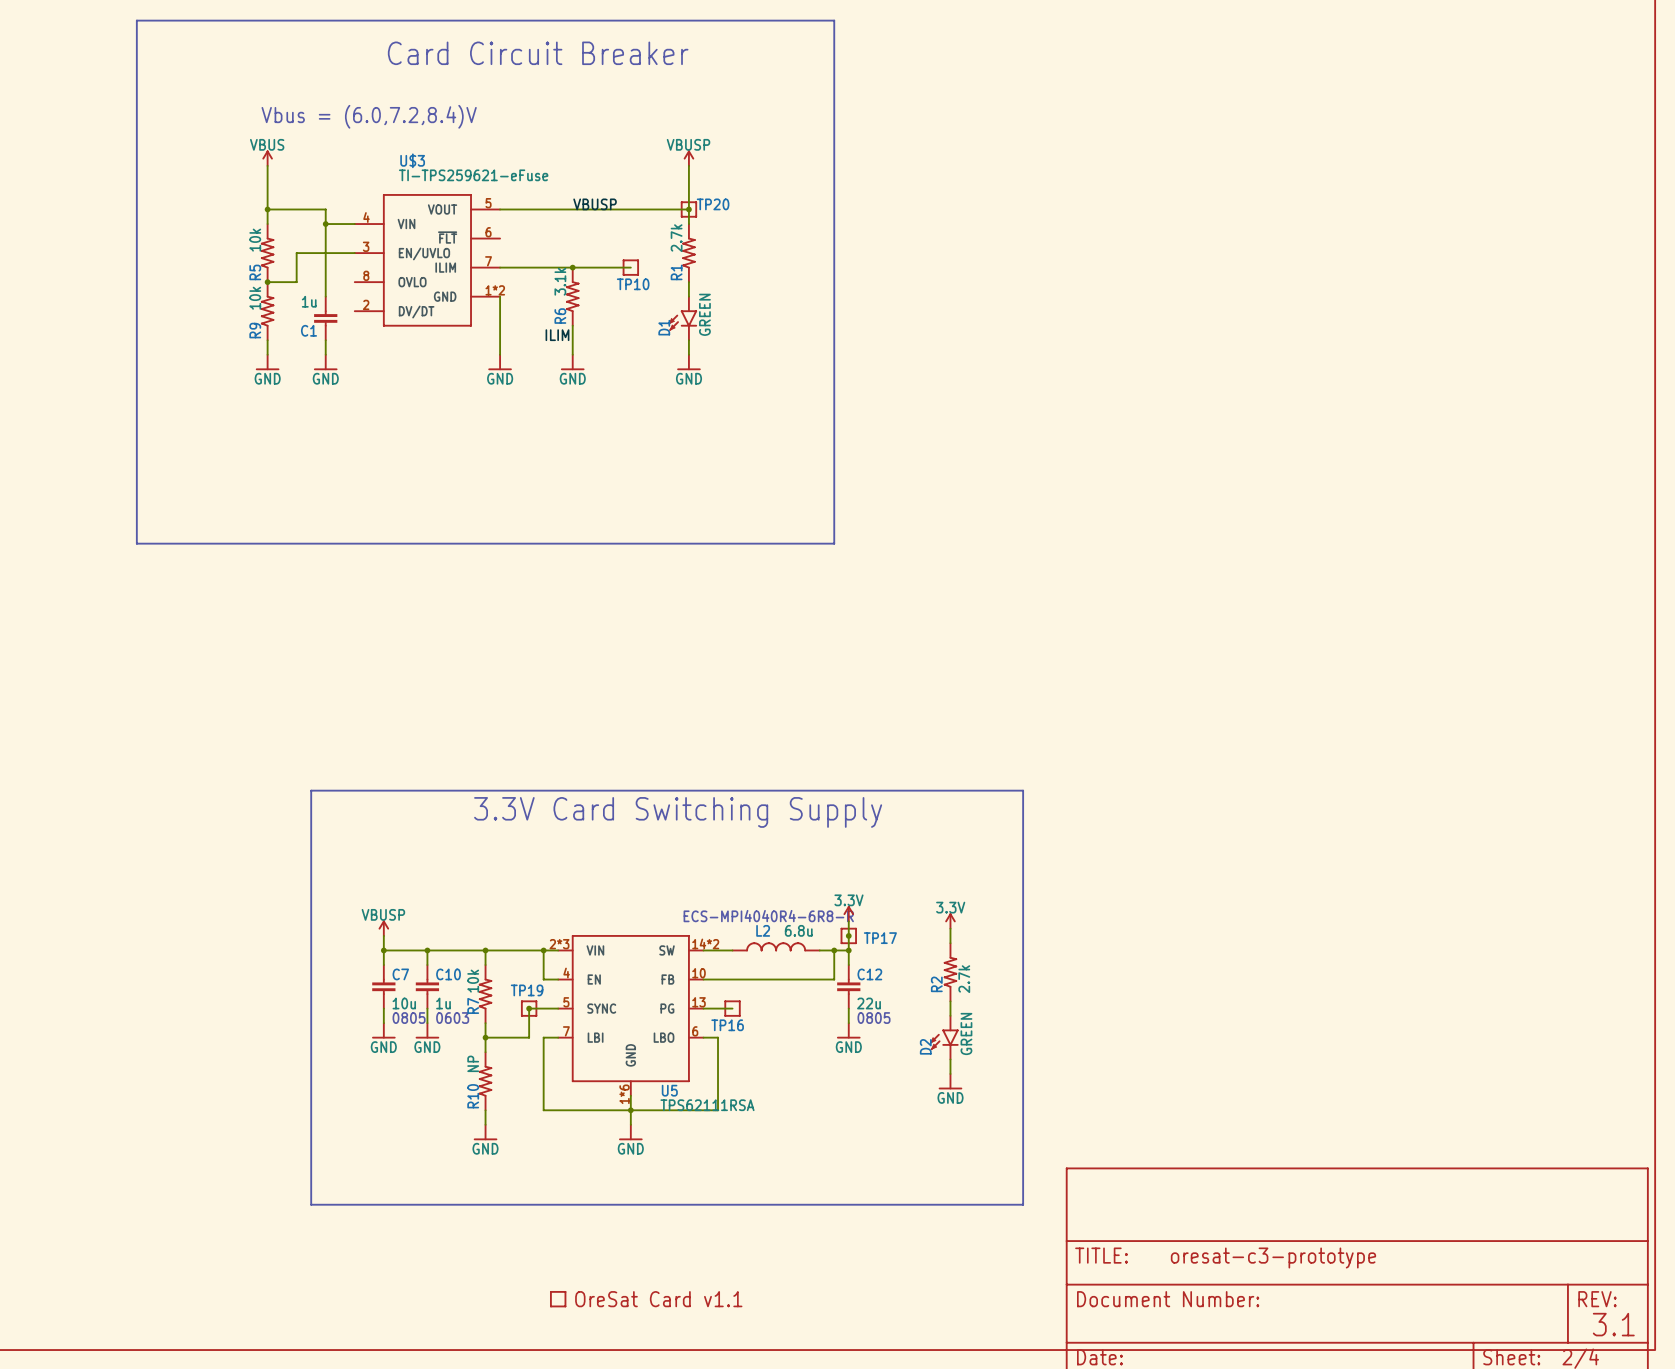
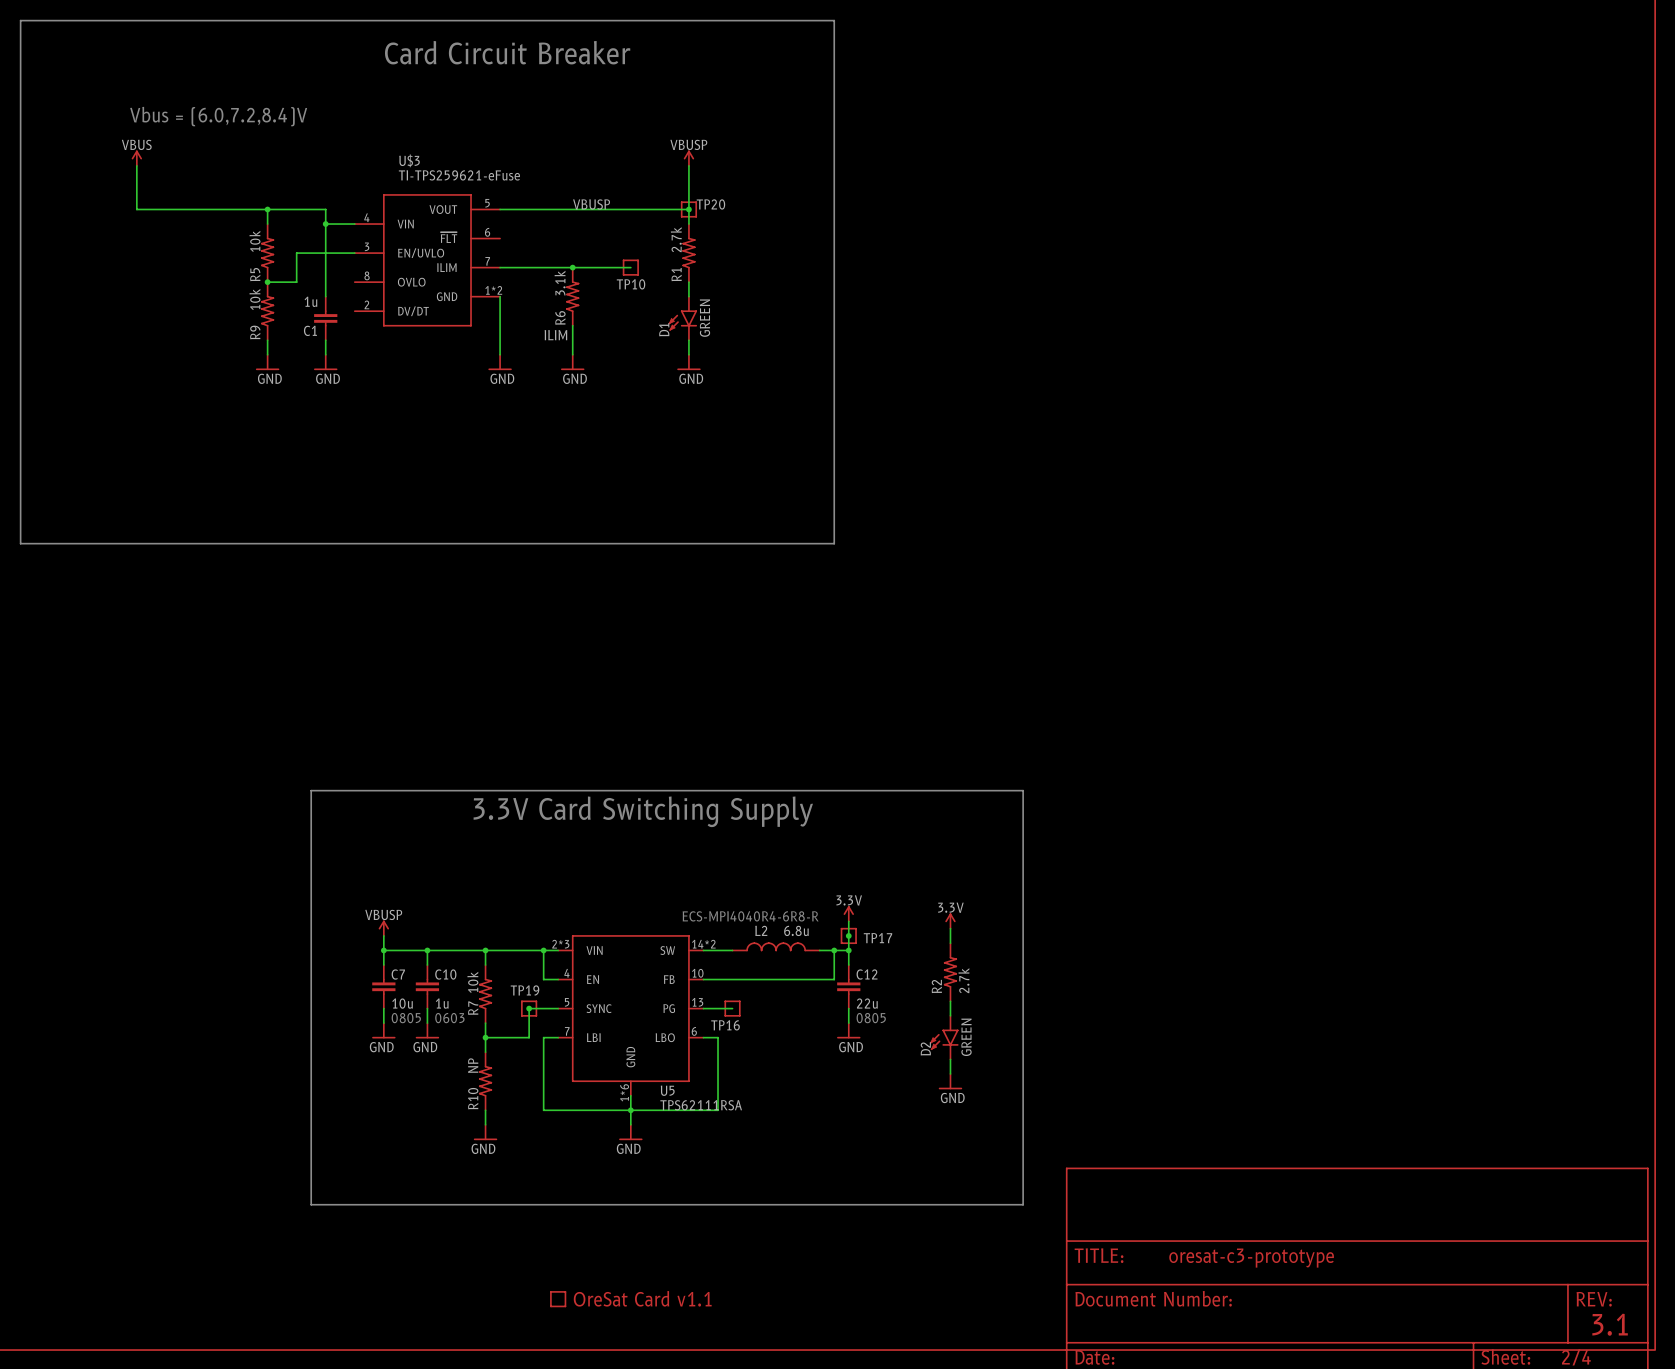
line: (136, 20) (136, 543) -> (136, 20) (20, 20) (20, 543) (136, 543)
text position: Vbus = (6.0,7.2,8.4)V (369, 116) -> Vbus = (6.0,7.2,8.4)V (218, 116)
power symbol position: VBUS (267, 158) -> VBUS (136, 158)
wire: (267, 165) (267, 209) -> (136, 165) (136, 209) (267, 209)

